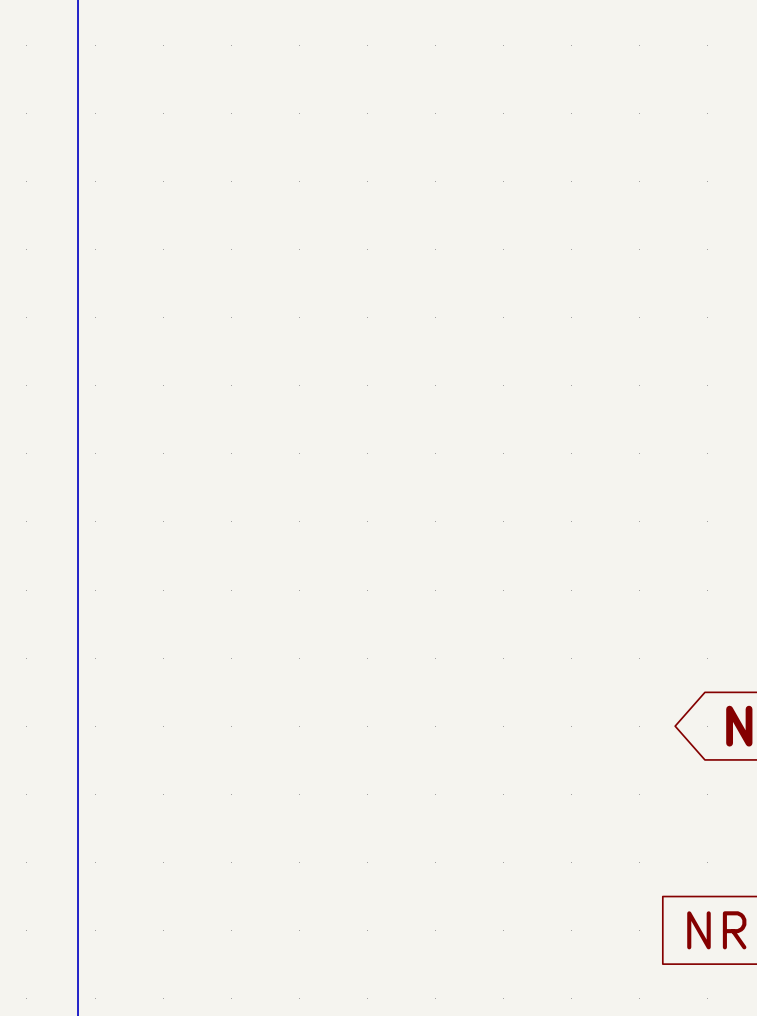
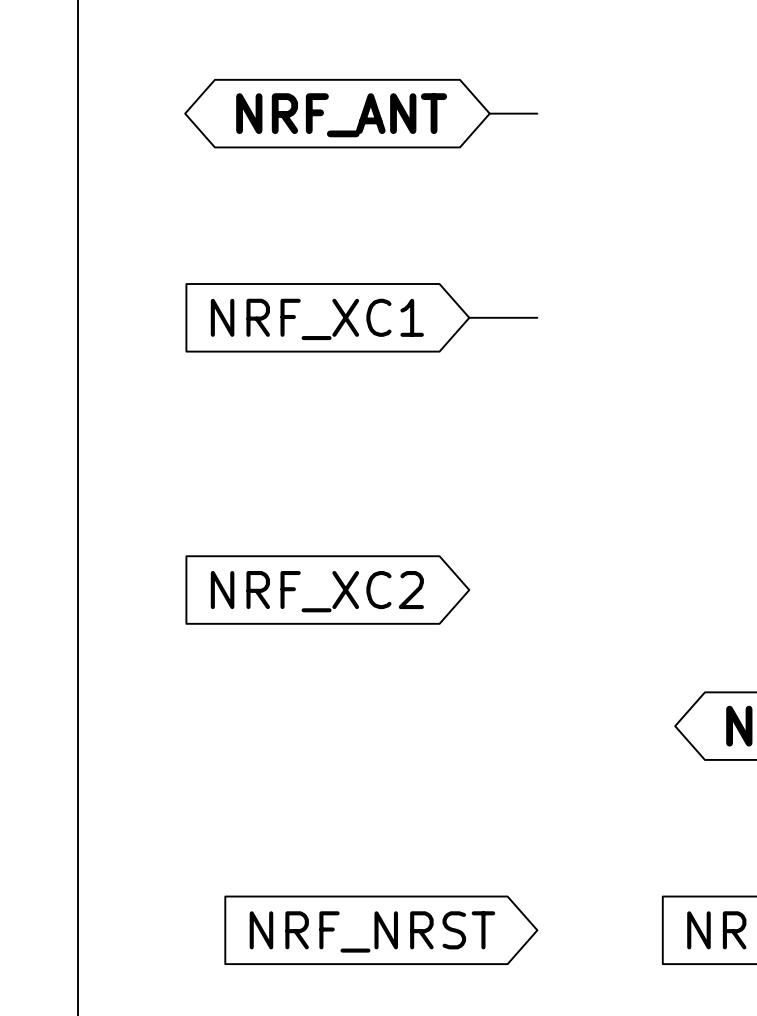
wire: none -> (489, 113) (537, 113)
global label: none -> NRF_ANT (341, 115)
wire: none -> (469, 317) (537, 317)
global label: none -> NRF_XC1 (317, 319)
global label: none -> NRF_XC2 (317, 591)
global label: none -> NRF_NRST (372, 931)

